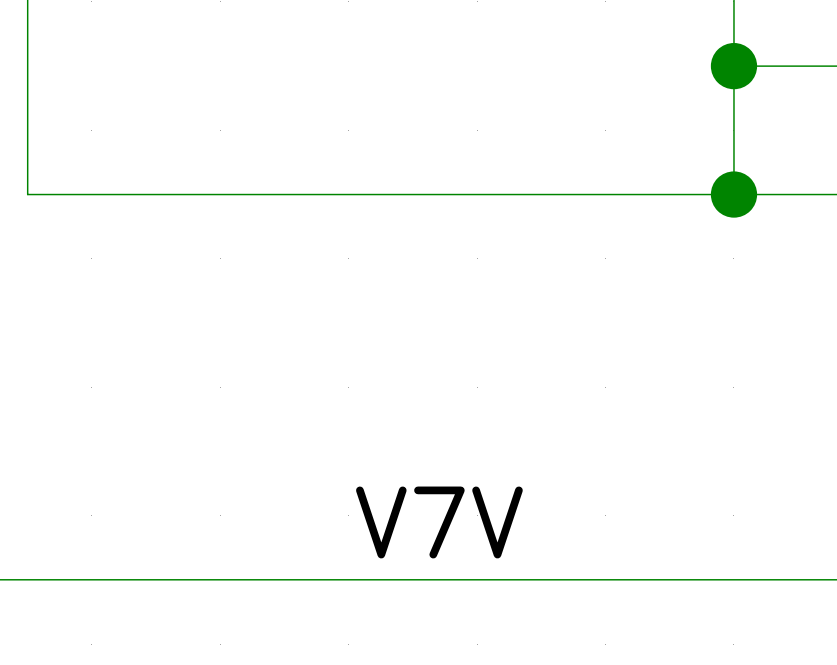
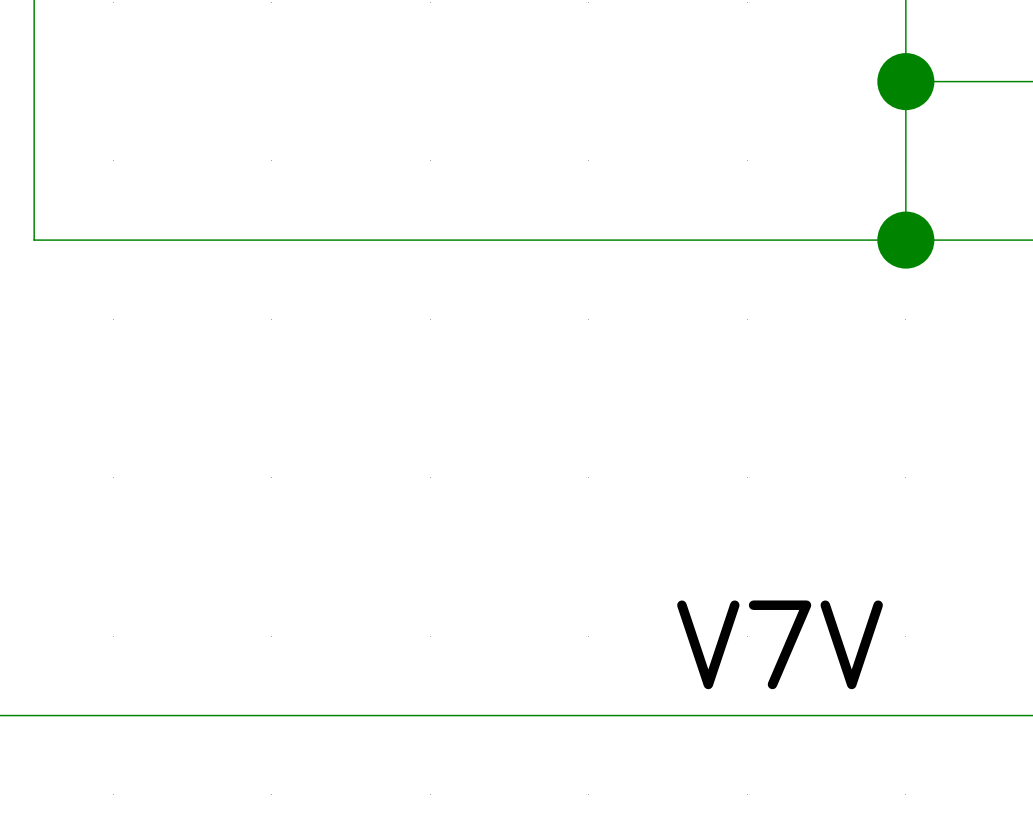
label position: V7V (439, 522) -> V7V (780, 644)

